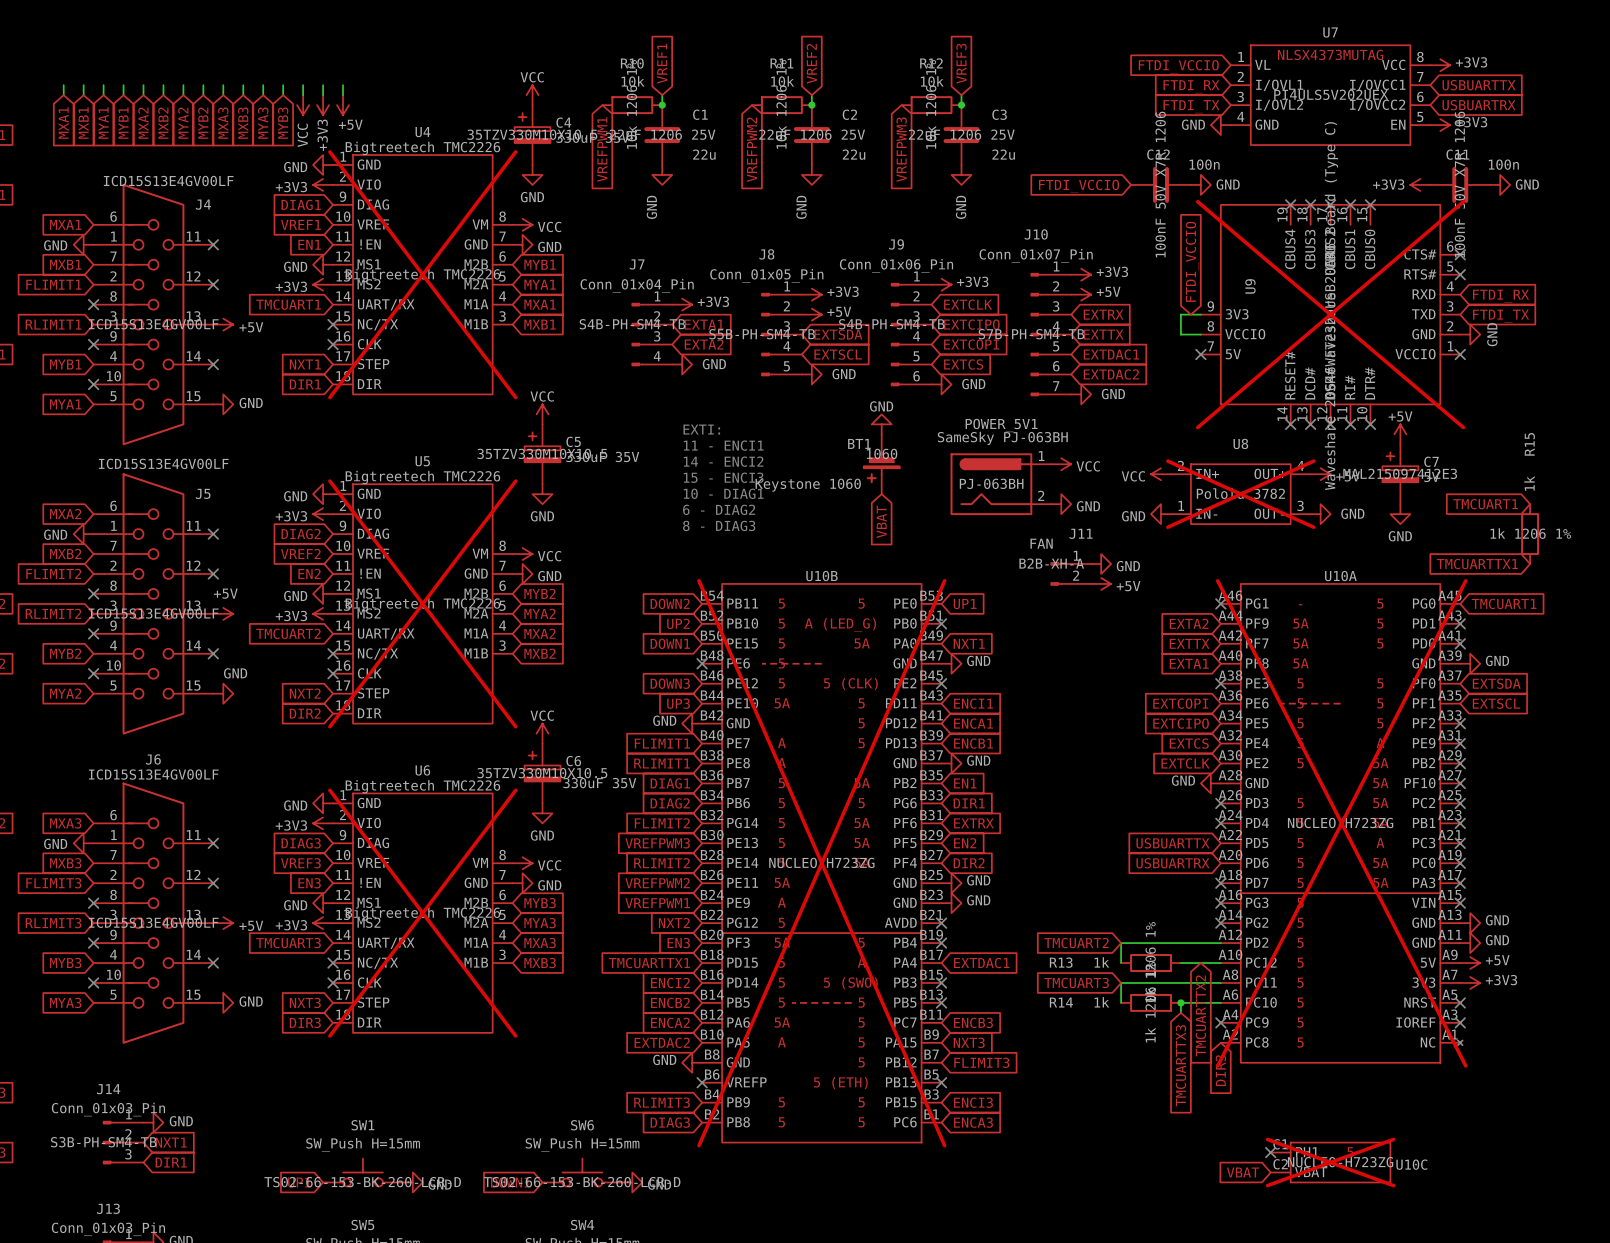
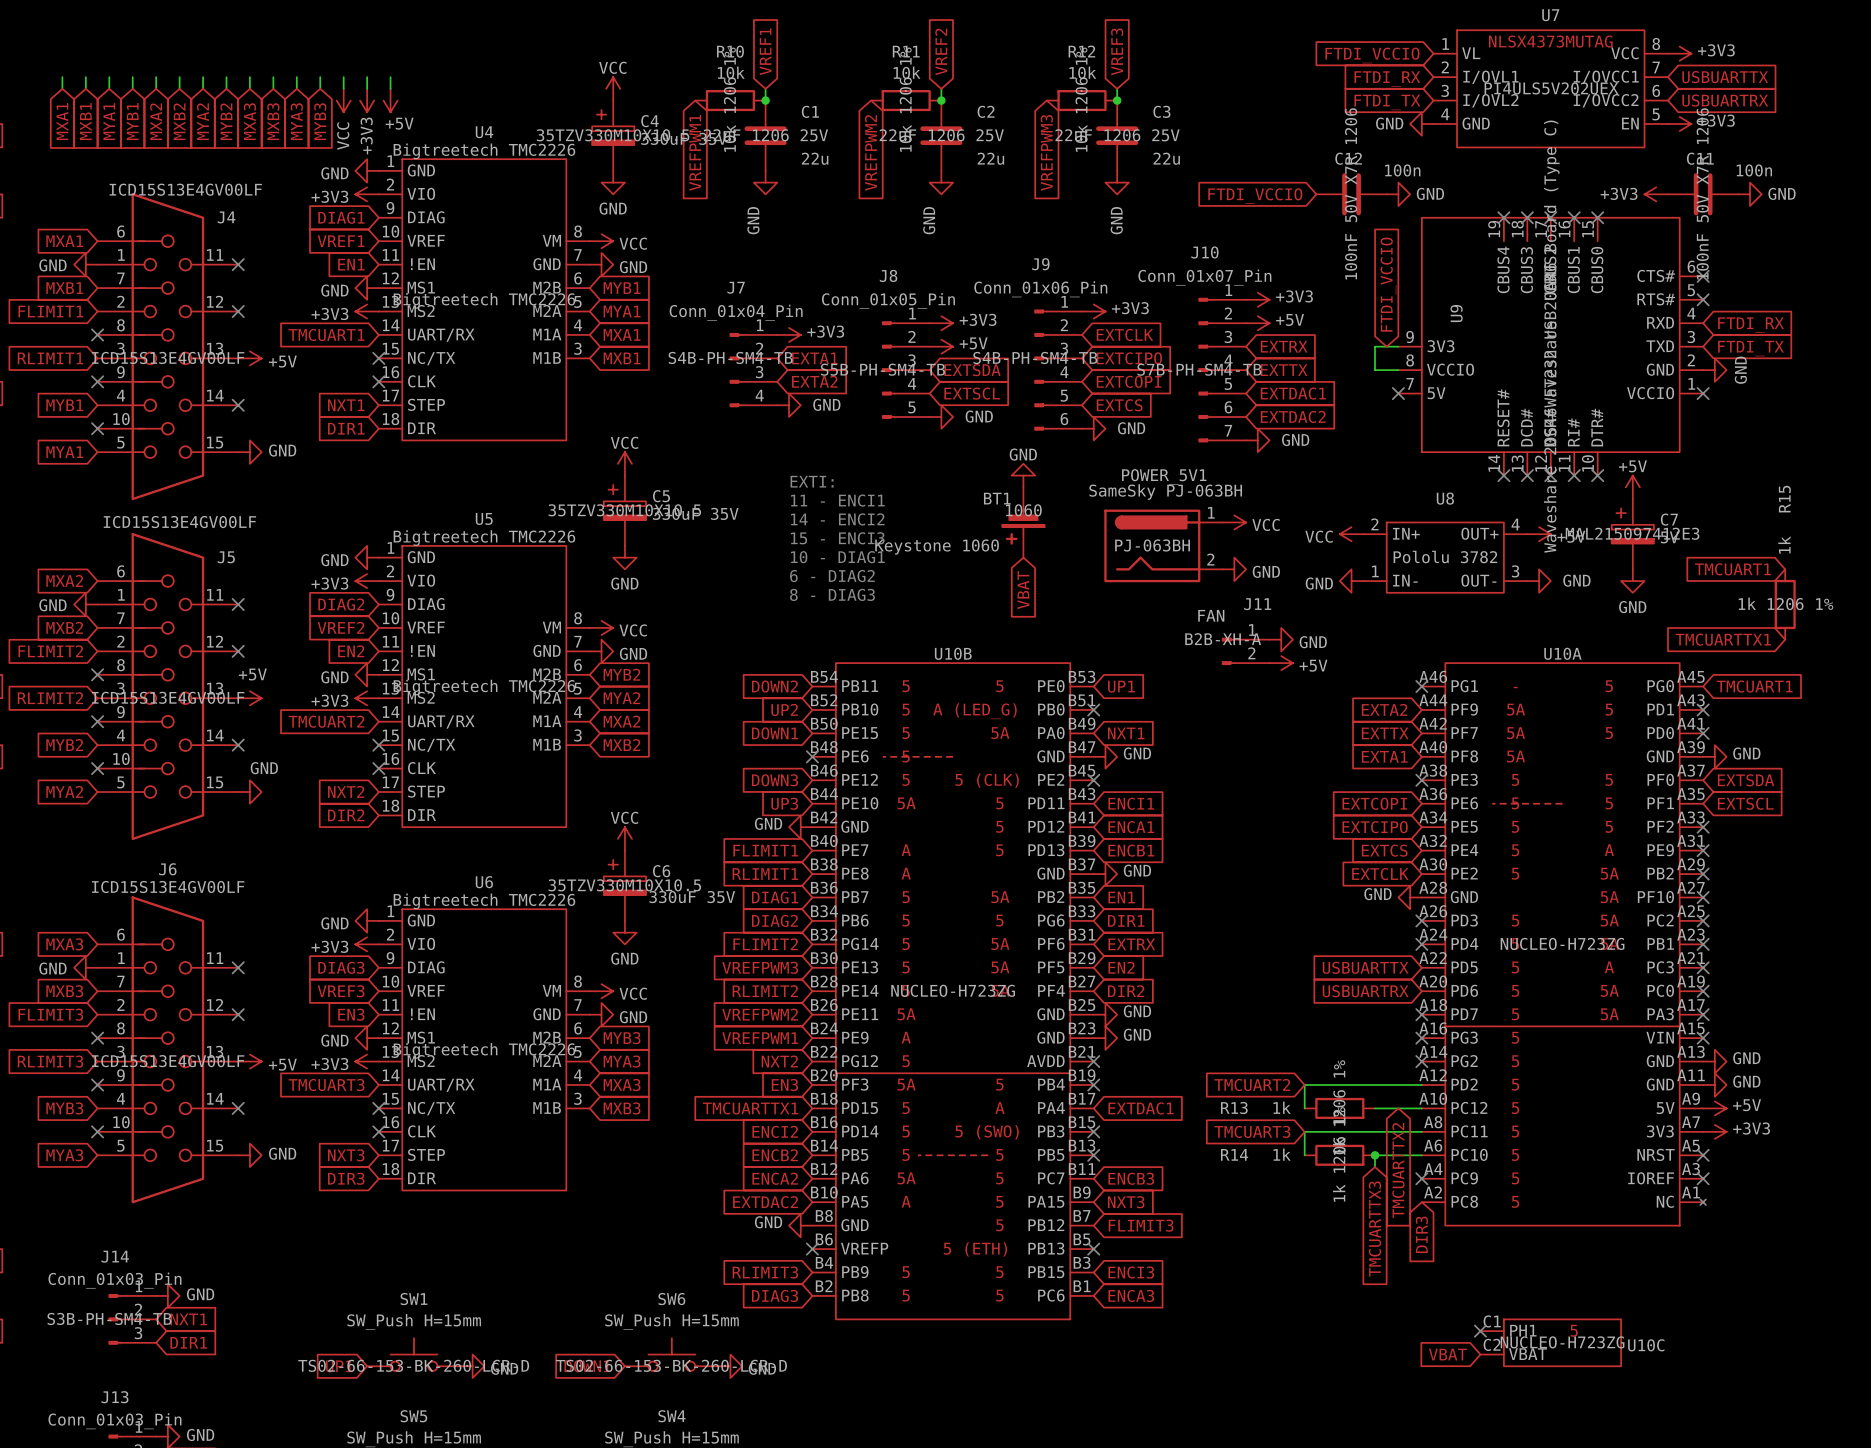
U4 do-not-place cross: (422, 274) -> none
U9 do-not-place cross: (1330, 314) -> none
U8 do-not-place cross: (1240, 494) -> none
U5 do-not-place cross: (422, 603) -> none
U10A do-not-place cross: (1341, 823) -> none
U10B do-not-place cross: (821, 863) -> none
U6 do-not-place cross: (422, 913) -> none
U10C do-not-place cross: (1330, 1162) -> none

